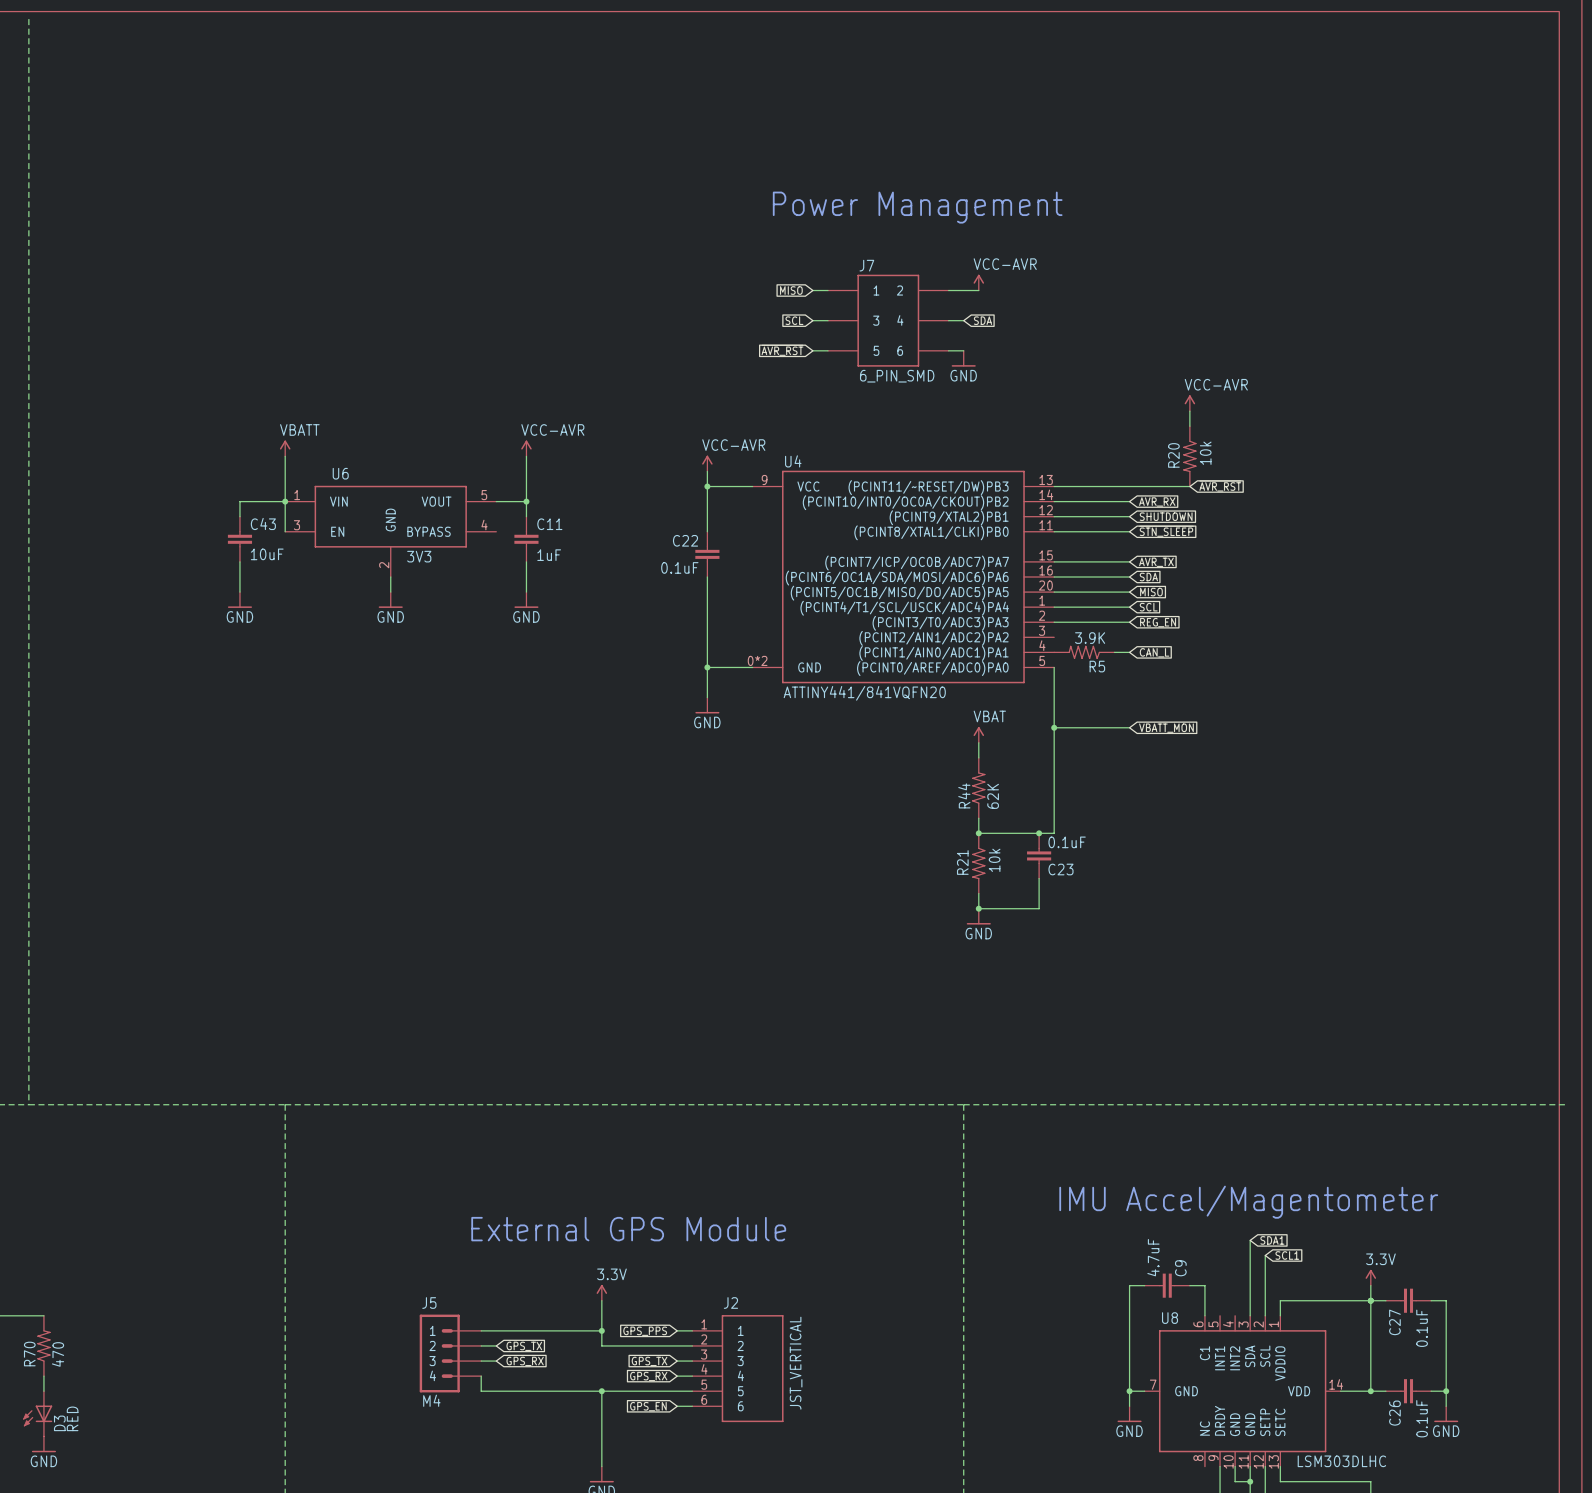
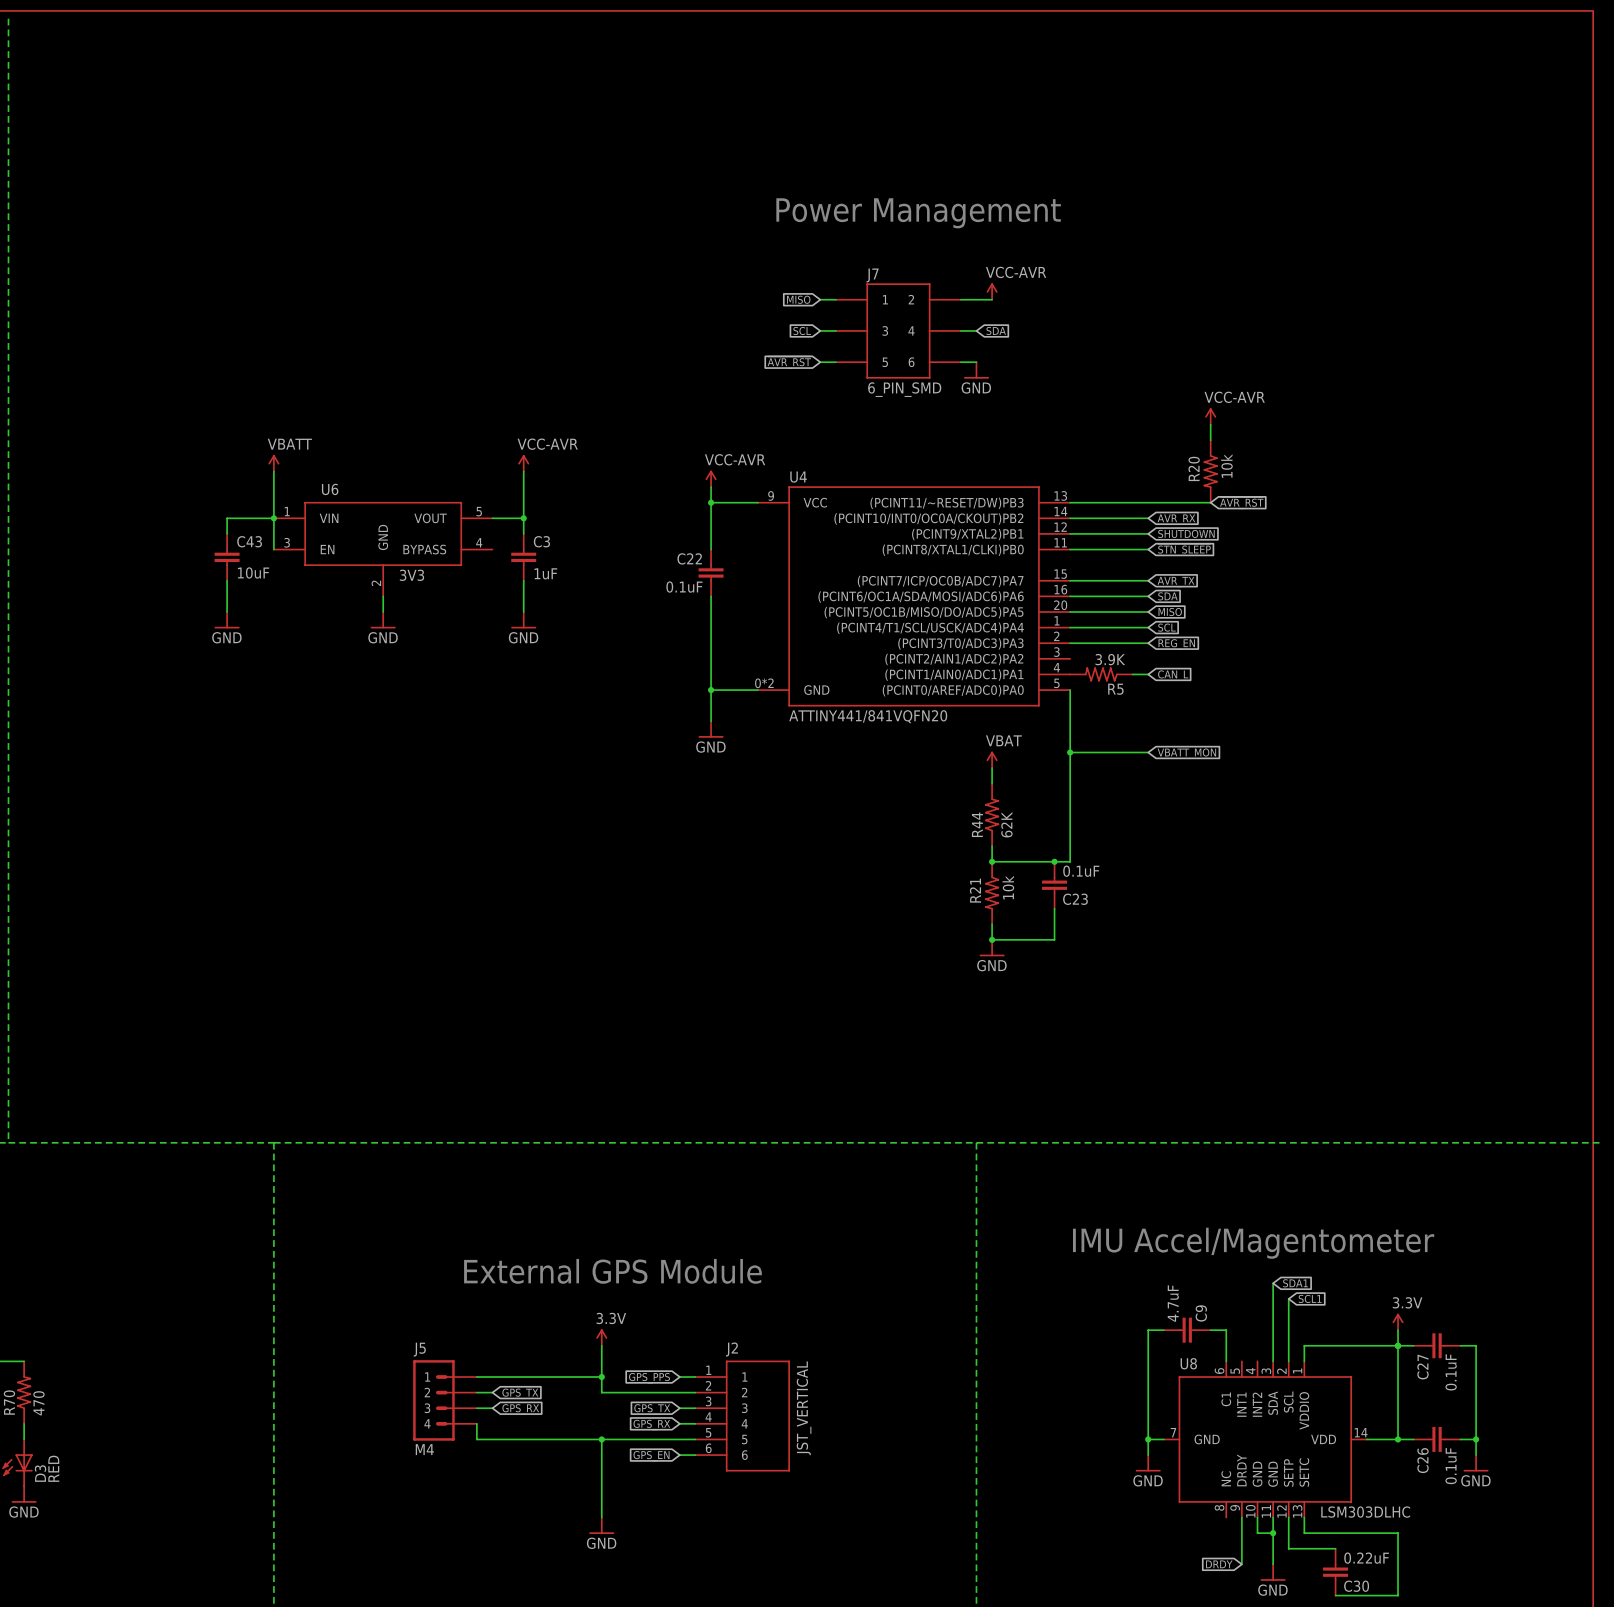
C11 name: C11 (549, 524) -> C3 (541, 541)

